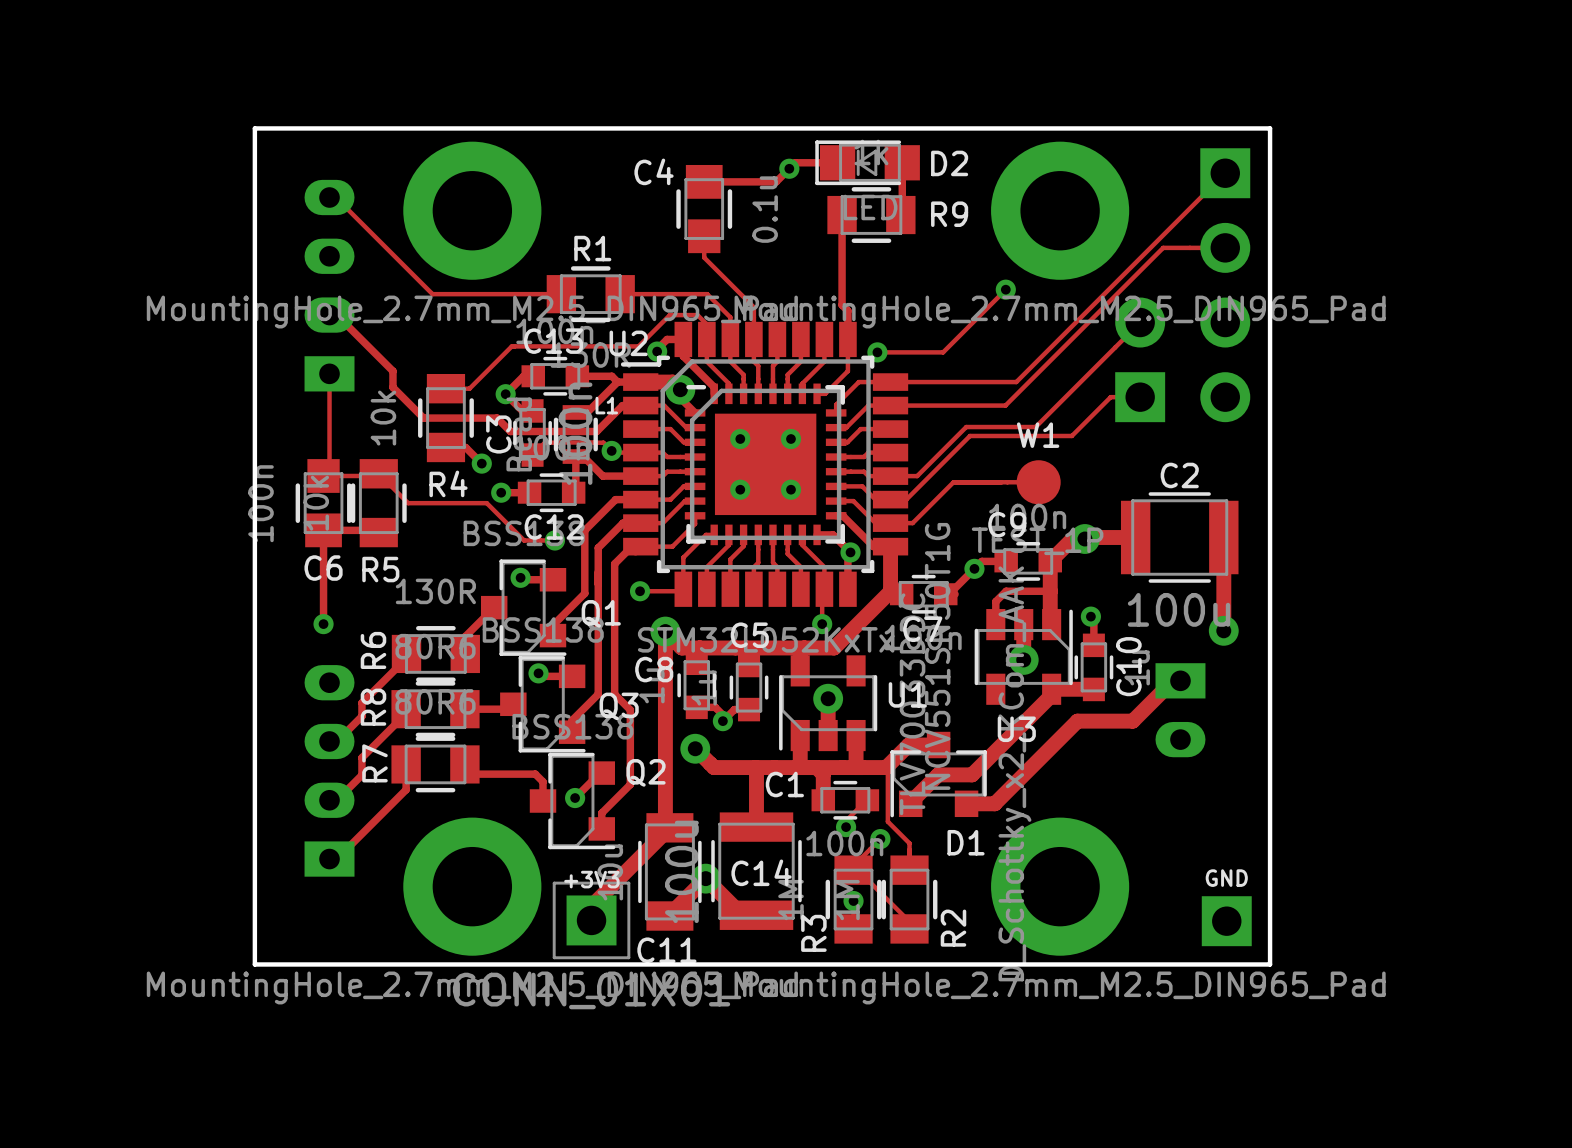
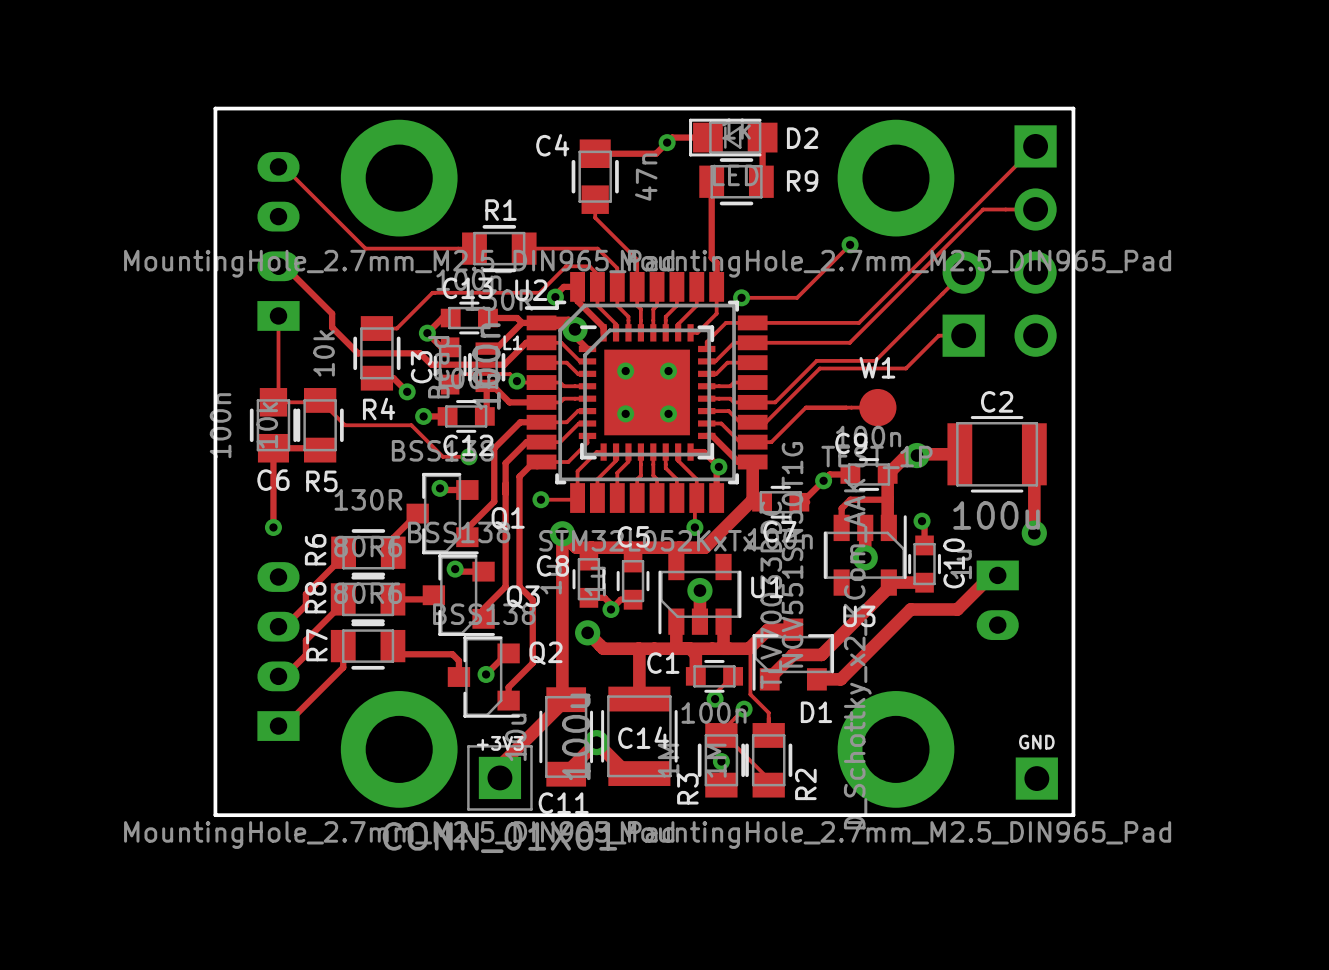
C4 value: 0.1u (765, 209) -> 47n (646, 177)

